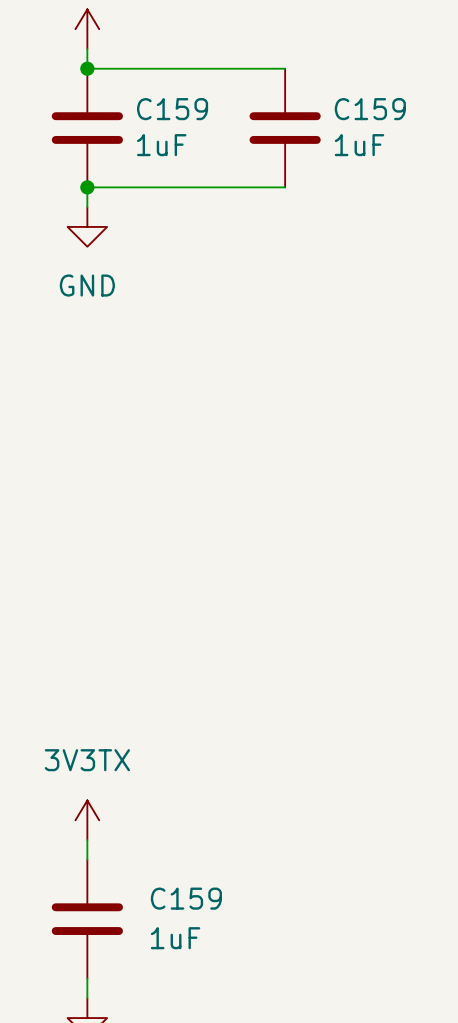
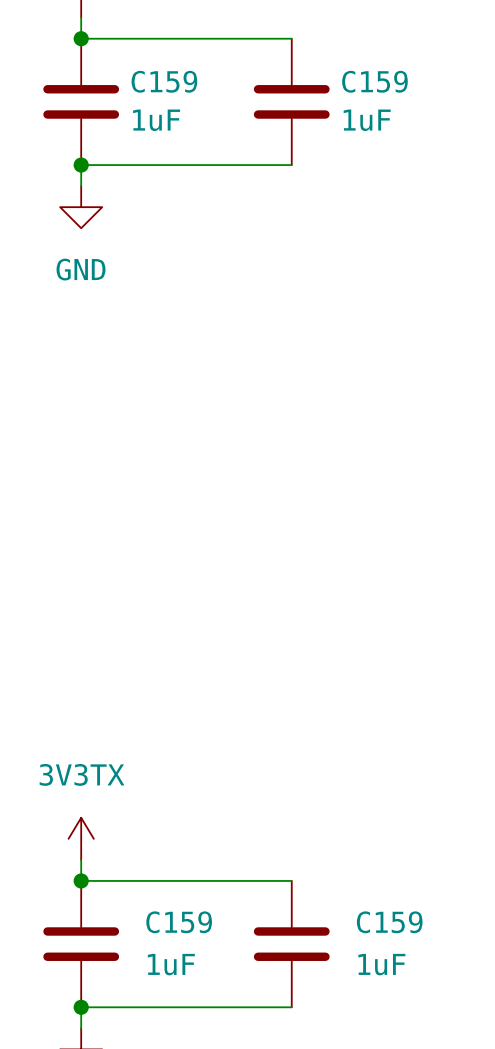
wire: none -> (81, 880) (291, 880)
junction: none -> (81, 880)
C159: none -> 1uF (291, 944)
wire: none -> (81, 1007) (291, 1007)
junction: none -> (81, 1007)

